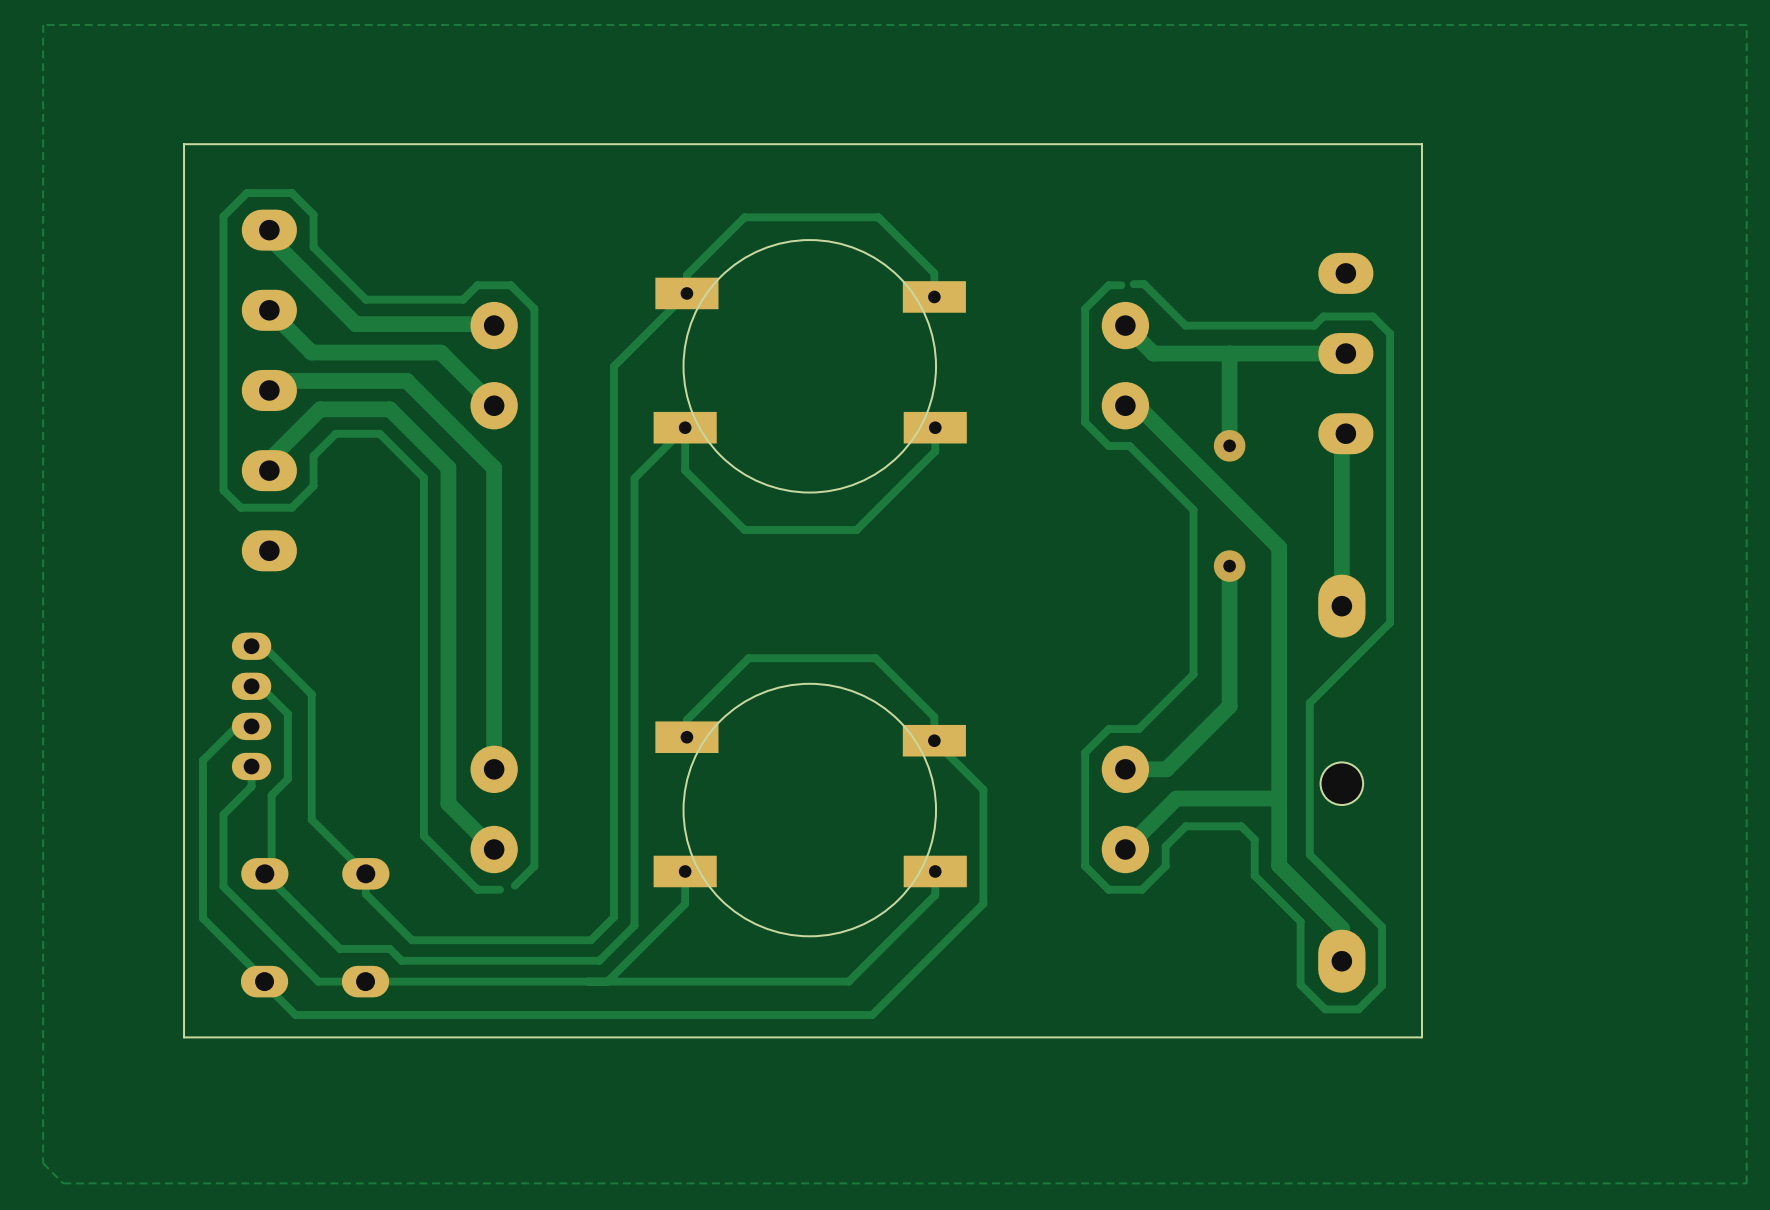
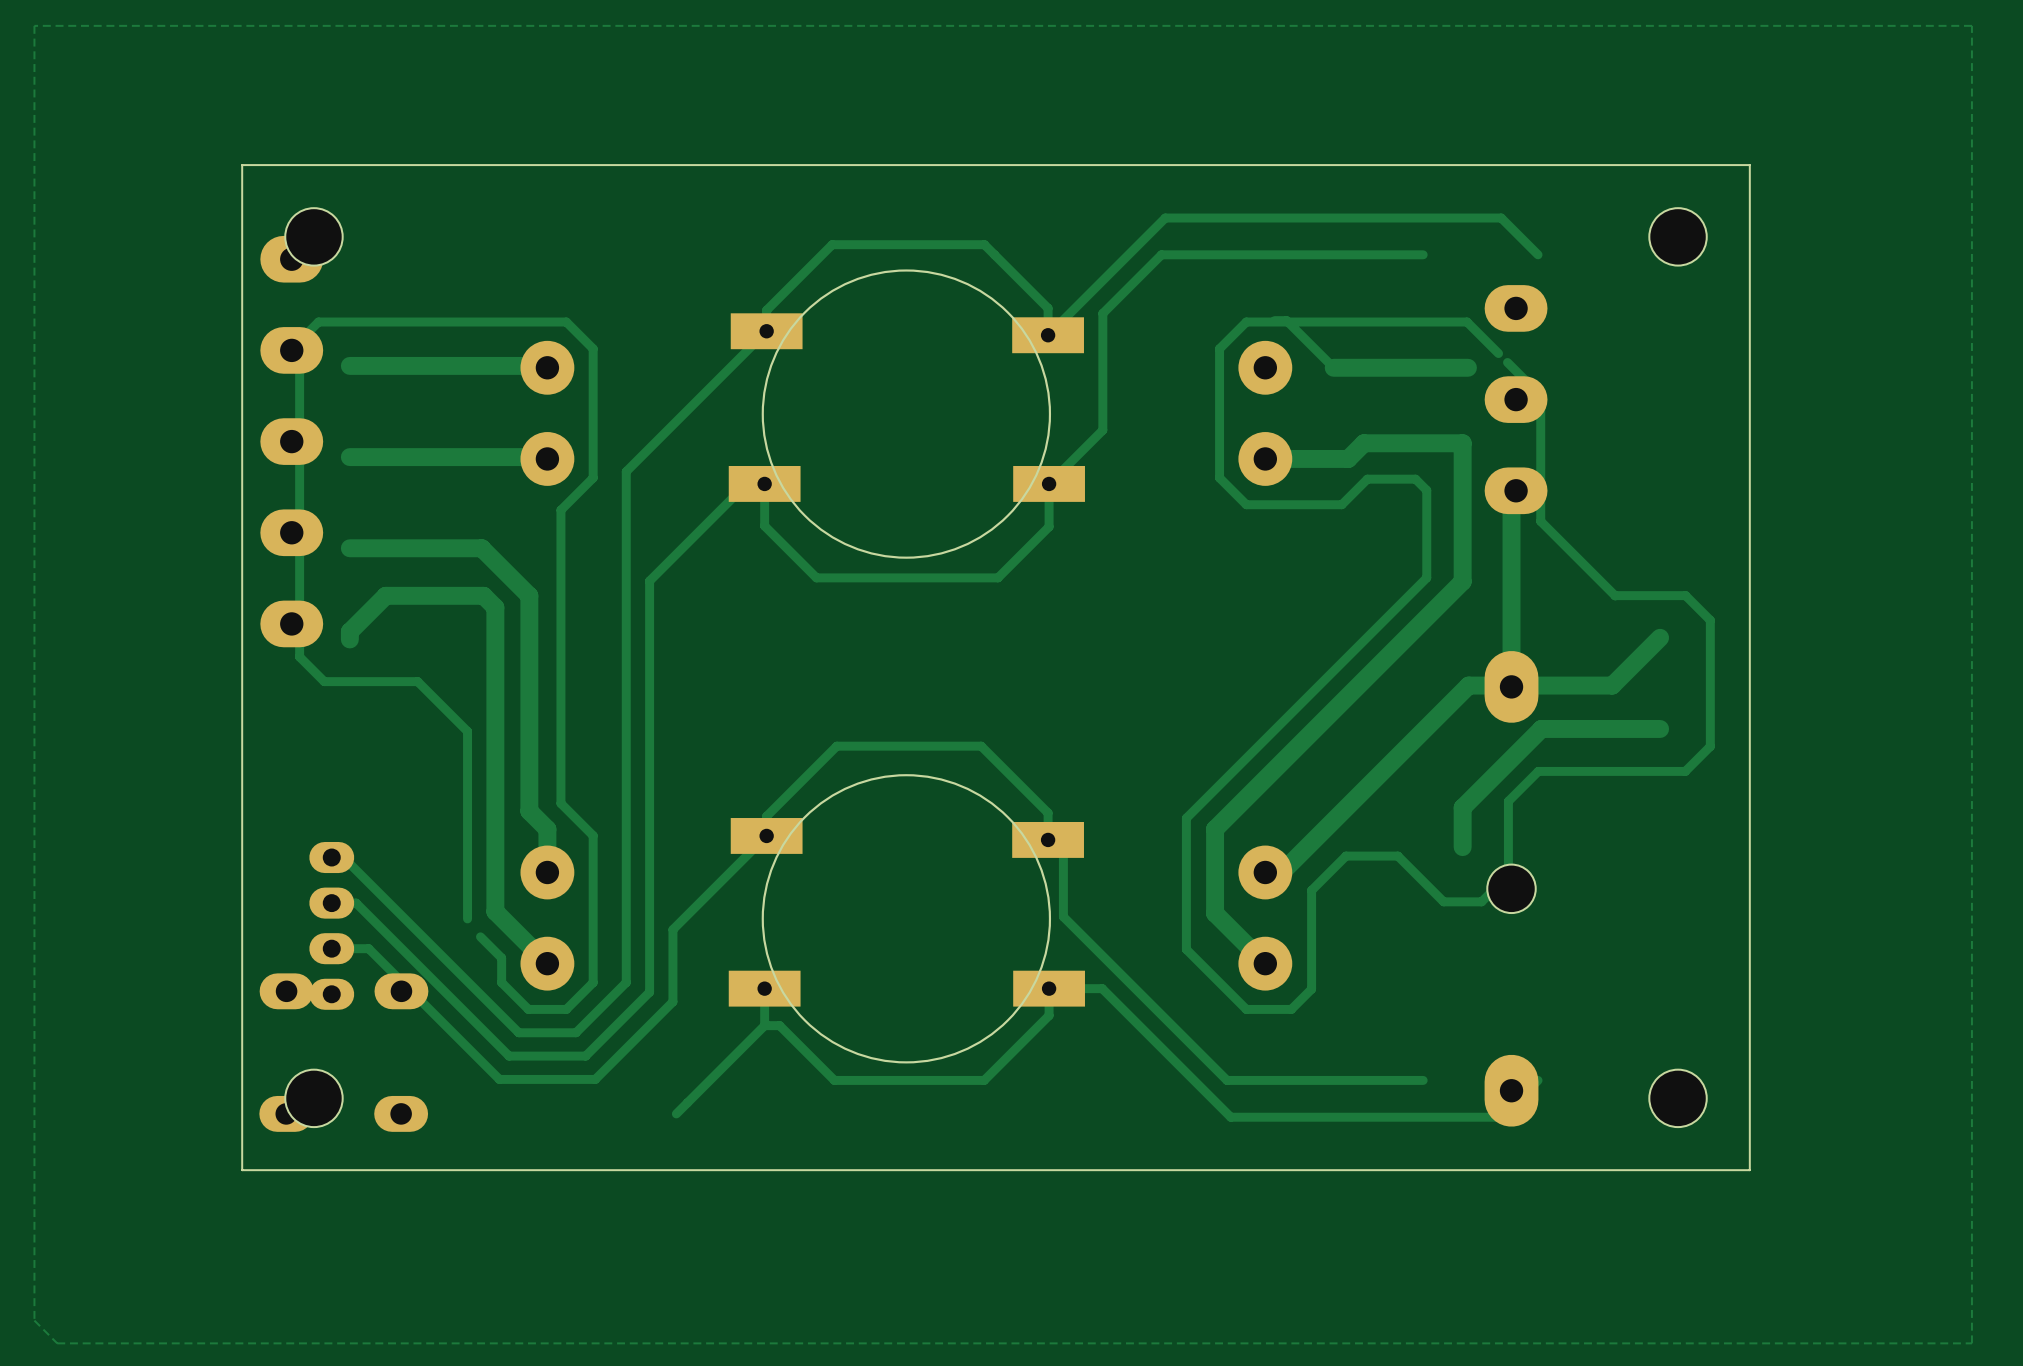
board edge: (1421, 144) (184, 144) (184, 1037) (1421, 1037) (1421, 144) -> (1749, 165) (1749, 1170) (242, 1170) (242, 165) (1749, 165)
part: none -> (313, 236)
part: none -> (1678, 236)
track: none -> (1423, 254) (1161, 254) (1102, 313) (1102, 430) (1049, 483)
track: none -> (1538, 254) (1501, 218) (1165, 218) (1048, 335)
track: (269, 230) (269, 237) (355, 324) (492, 324) -> (349, 365) (545, 365)
track: (477, 285) (463, 299) (365, 299) (313, 247) (313, 214) (291, 193) (246, 193) (223, 216) (223, 490) (240, 507) (291, 507) (313, 485) (313, 455) (335, 433) (379, 433) (423, 477) (423, 645) -> (528, 322) (318, 322) (299, 340) (299, 656) (324, 681) (417, 681) (467, 731)
track: none -> (1260, 322) (1467, 322) (1498, 353)
track: (269, 310) (311, 352) (440, 352) (492, 404) -> (349, 457) (545, 457)
track: none -> (1507, 362) (1540, 395) (1540, 521) (1615, 595)
track: (1125, 325) (1153, 353) (1345, 353) -> none
track: (1303, 325) (1314, 325) (1323, 316) (1372, 316) (1390, 333) (1390, 622) (1309, 703) (1309, 854) (1382, 926) (1382, 985) (1358, 1009) (1325, 1009) (1300, 984) (1300, 921) (1254, 875) (1254, 839) (1241, 826) (1185, 826) (1165, 846) (1165, 866) (1142, 889) -> (1615, 595) (1685, 595) (1710, 620) (1710, 746) (1685, 771) (1538, 771) (1508, 801) (1508, 875) (1481, 901) (1443, 901) (1397, 856) (1345, 856) (1311, 890) (1311, 989) (1291, 1009) (1284, 1009)
track width: thin (1303, 325) (1185, 325) -> thick (1467, 367) (1333, 367)
track: (1229, 353) (1229, 445) -> none
track: (614, 366) (614, 917) (590, 940) (411, 940) (365, 894) (365, 873) (311, 819) (311, 694) (263, 646) (251, 646) -> (683, 414) (626, 471) (626, 982) (576, 1032) (518, 1032) (343, 857) (331, 857)
track: (269, 390) (278, 380) (406, 380) (494, 468) (494, 731) -> (349, 548) (481, 548) (529, 595) (529, 811) (547, 829)
track: (1137, 405) (1279, 547) (1279, 865) (1341, 928) (1341, 961) -> (1279, 458) (1348, 458) (1363, 443) (1462, 443) (1462, 581) (1215, 829) (1215, 913) (1265, 963)
track: (534, 422) (534, 736) -> (593, 477) (560, 510) (560, 803) (593, 835)
track: (685, 427) (634, 478) (634, 925) (599, 960) (401, 960) (389, 948) (339, 948) (264, 873) (271, 867) (271, 795) (287, 779) (287, 713) (260, 686) (251, 686) -> (764, 483) (746, 483) (649, 581) (649, 992) (585, 1056) (509, 1056) (356, 903) (331, 903)
track: (1129, 445) (1193, 509) (1193, 674) (1138, 729) (1108, 729) (1085, 752) (1085, 866) -> (1270, 504) (1341, 504) (1367, 479) (1415, 479) (1426, 490) (1426, 577) (1186, 818) (1186, 949) (1219, 982)
via: (1229, 445) -> none
track: (935, 451) (856, 530) (744, 530) (685, 470) (685, 464) -> (1049, 510) (1049, 526) (998, 577) (816, 577) (764, 526)
track: (269, 470) (269, 460) (320, 409) (389, 409) (448, 467) (448, 536) -> (349, 639) (349, 631) (385, 595) (483, 595) (495, 607)
track: (1229, 566) (1229, 706) (1166, 769) (1139, 769) -> (1660, 637) (1612, 685) (1468, 685) (1281, 872)
via: (1229, 566) -> none
track: none -> (1660, 728) (1541, 728) (1462, 807) (1462, 847)
part position: (251, 706) -> (331, 925)
track: (251, 726) (237, 726) (202, 760) (202, 918) (264, 979) (264, 983) (295, 1015) (872, 1015) (983, 903) (983, 789) (947, 754) -> (1423, 1080) (1227, 1080) (1063, 916) (1063, 855)
track: none -> (766, 835) (672, 929) (672, 1001) (595, 1079) (499, 1079) (368, 948) (331, 948)
track: (251, 766) (251, 786) (223, 814) (223, 886) (318, 981) (848, 981) (878, 952) -> (764, 1025) (779, 1025) (834, 1080) (984, 1080)
track: (1279, 798) (1176, 798) (1125, 849) -> none
track: (423, 810) (423, 836) (453, 866) -> (480, 936) (501, 957) (501, 982)
track: none -> (1049, 988) (1102, 988) (1230, 1117) (1501, 1117) (1538, 1080)
track: none -> (571, 1004) (566, 1009) (554, 1009)
part: none -> (313, 1098)
part: none -> (1678, 1098)

